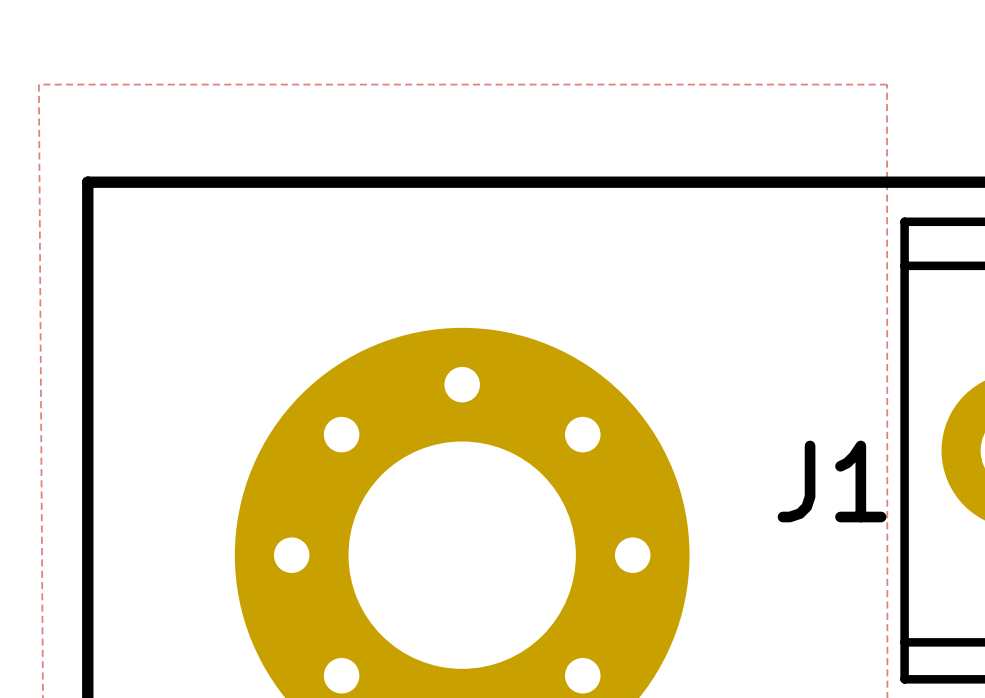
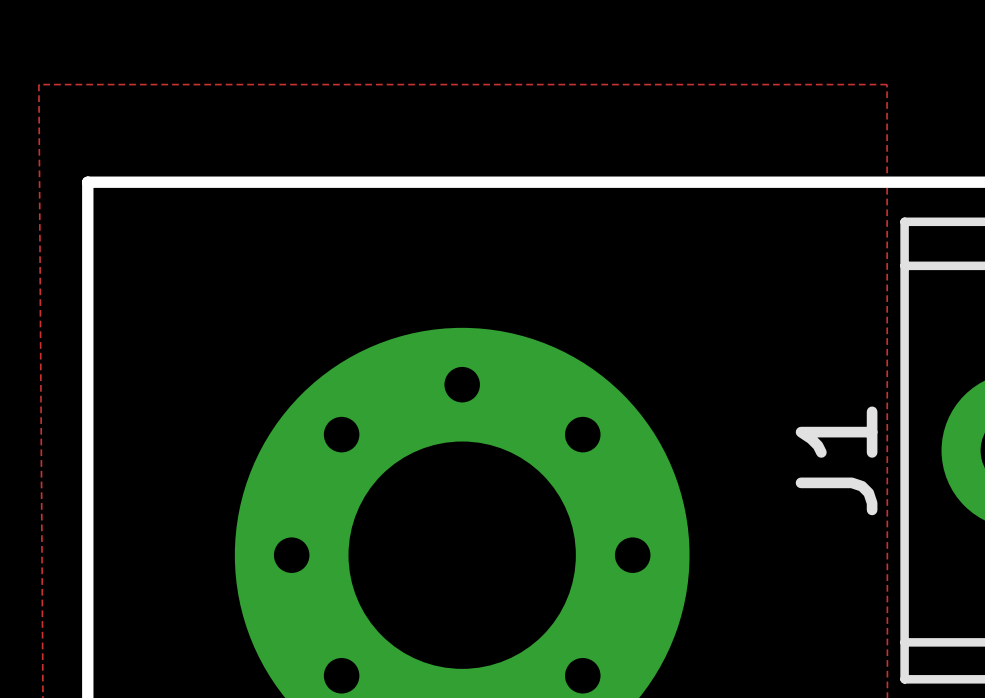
J1 name rotation: 0° (832, 481) -> 90° counterclockwise (836, 460)

